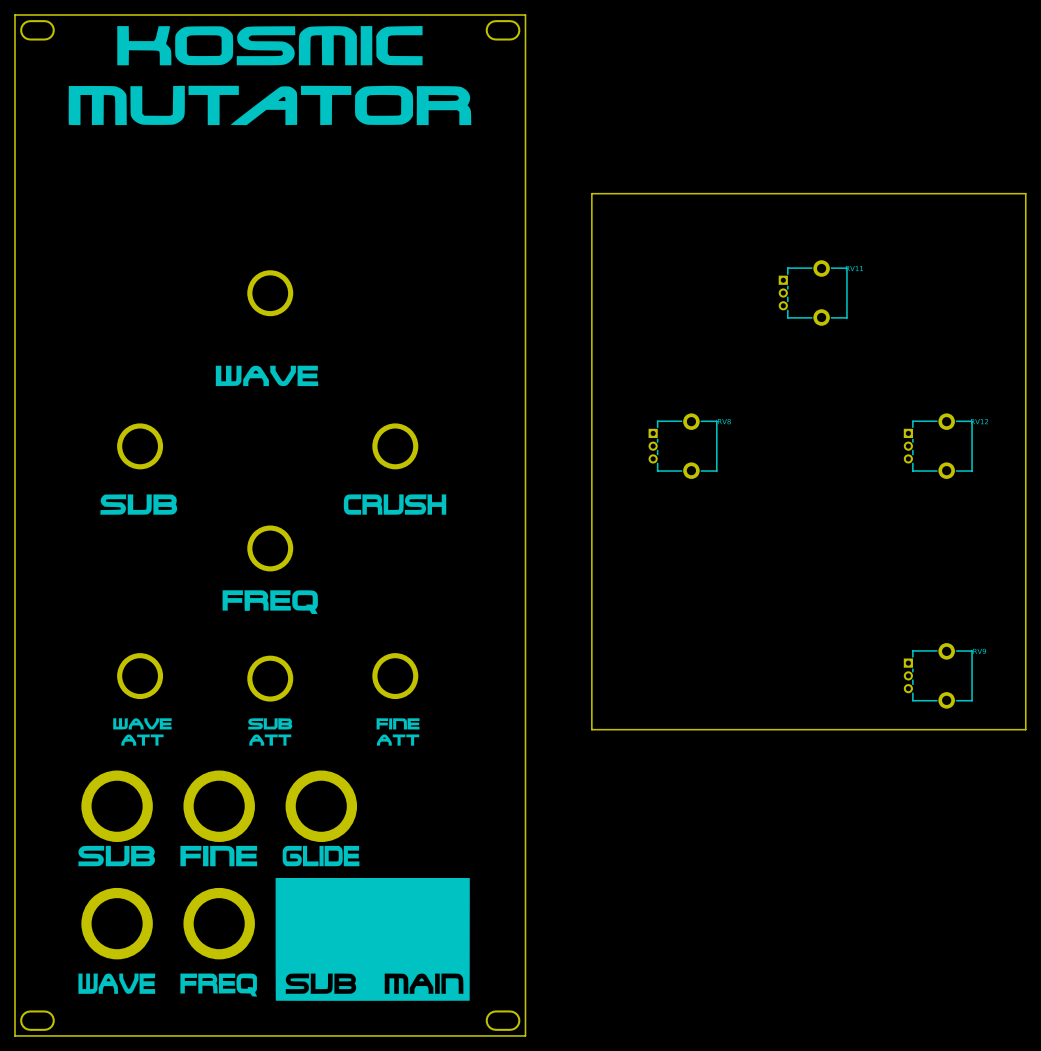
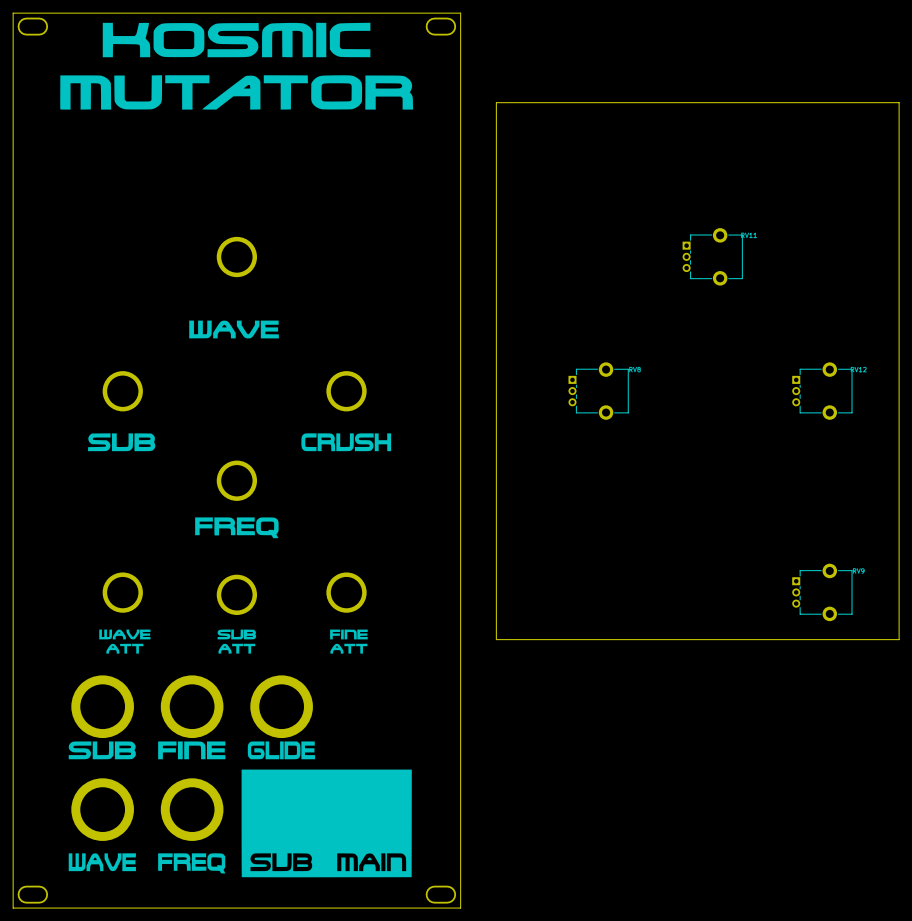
board edge: (1025, 193) (591, 193) (591, 729) -> (899, 169) (899, 102) (496, 102) (496, 639) (518, 639)

